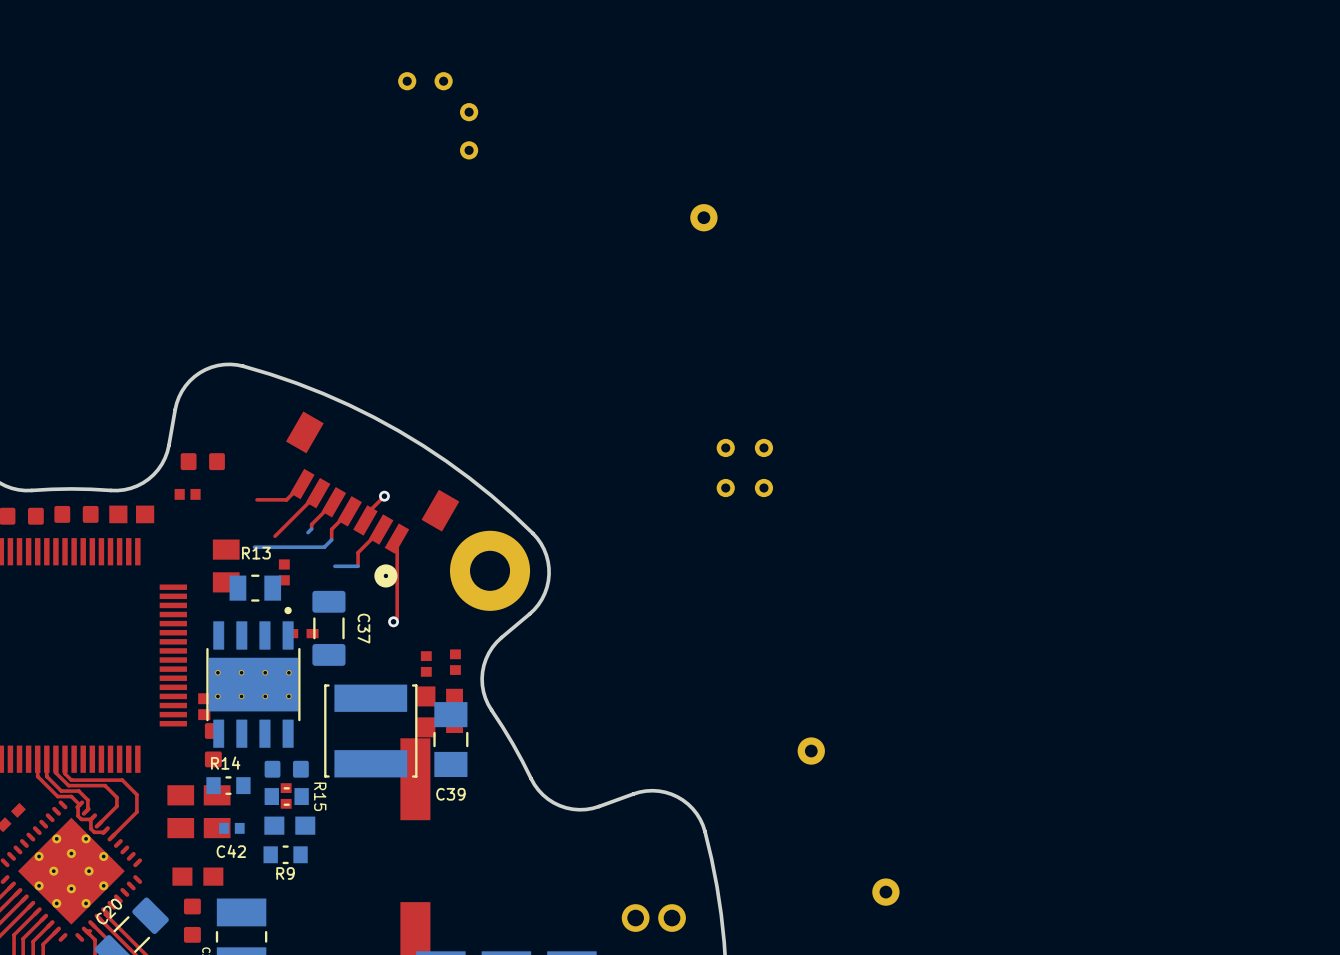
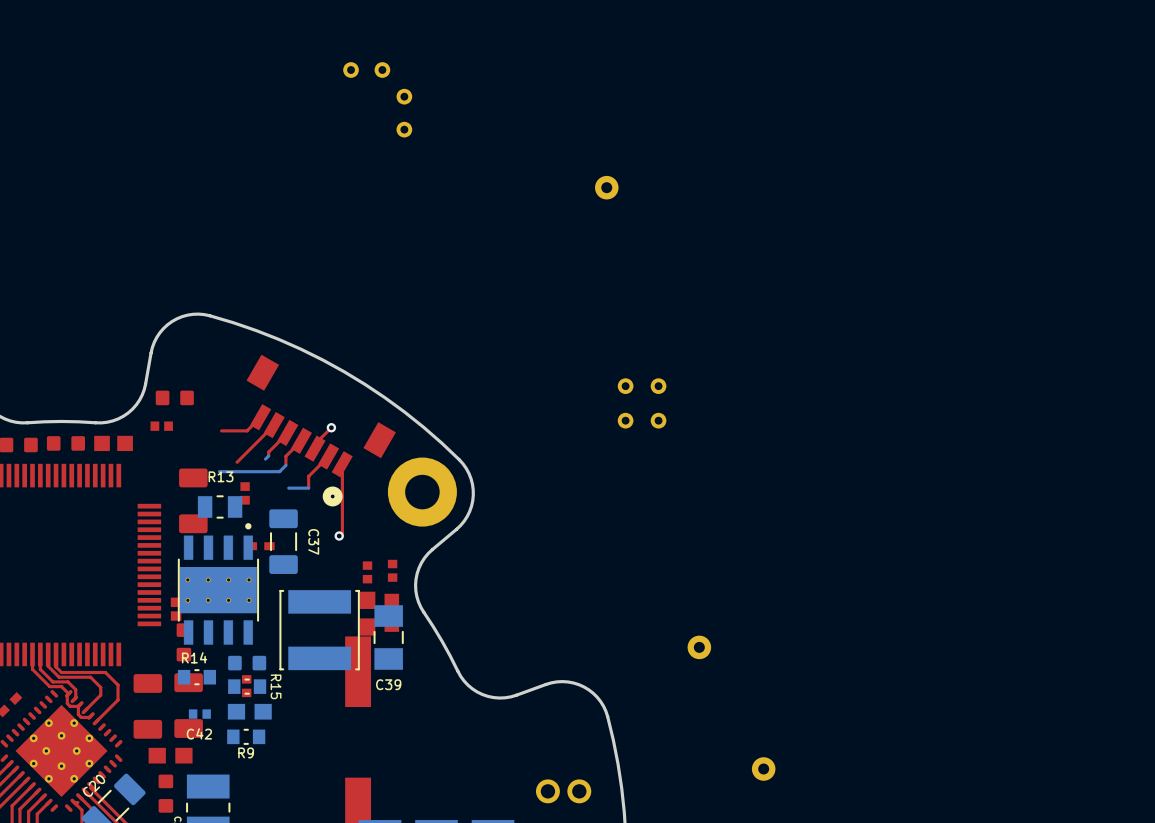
part footprint: [212, 539, 240, 593] -> [179, 468, 208, 534]
part footprint: [167, 785, 195, 839] -> [133, 674, 163, 739]
part footprint: [203, 785, 231, 839] -> [174, 673, 203, 738]

